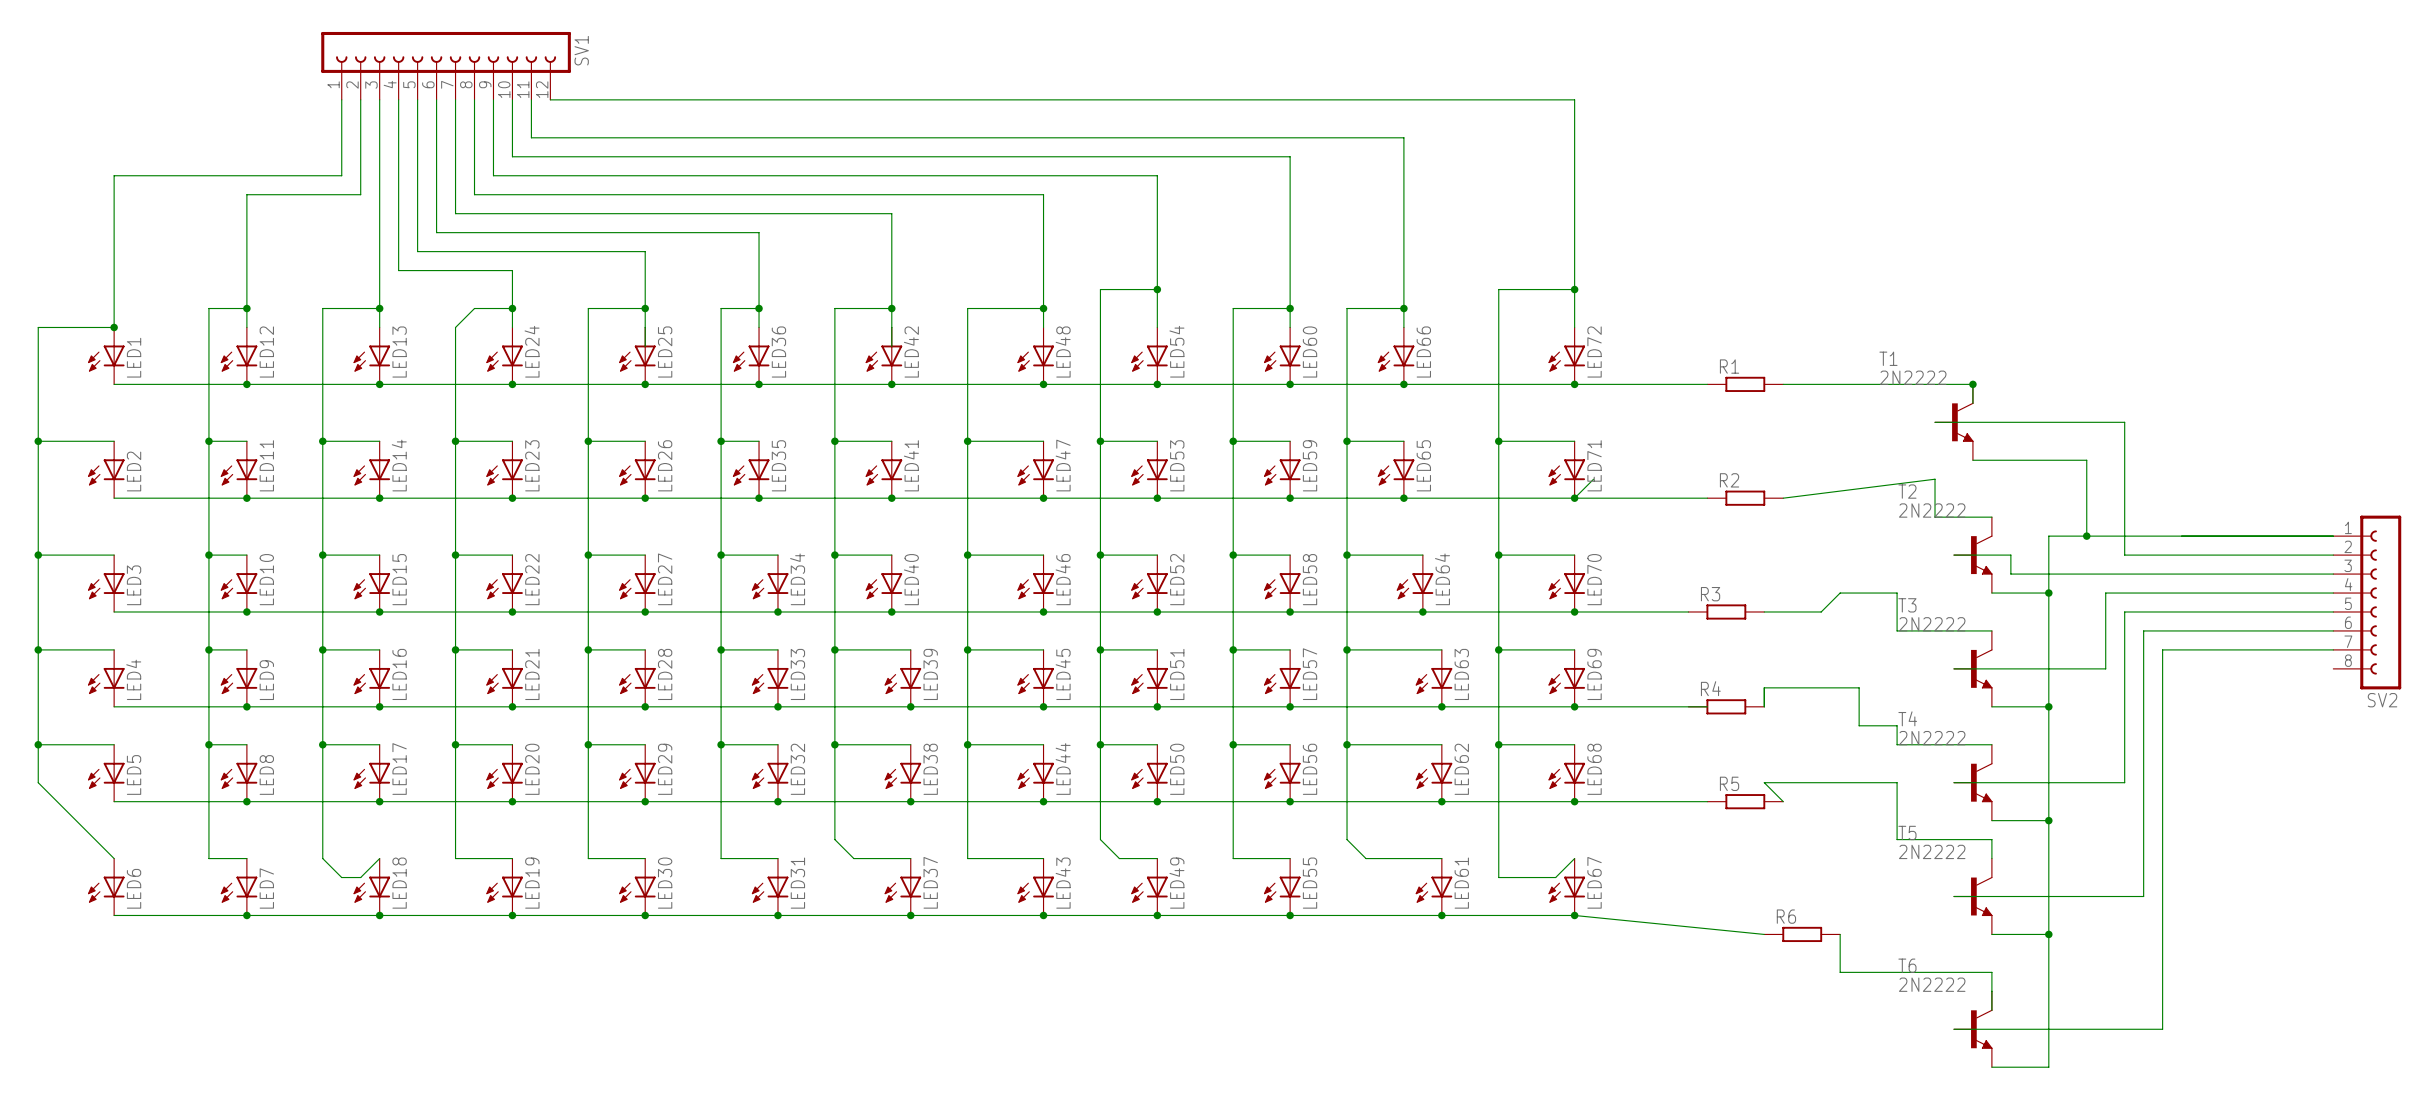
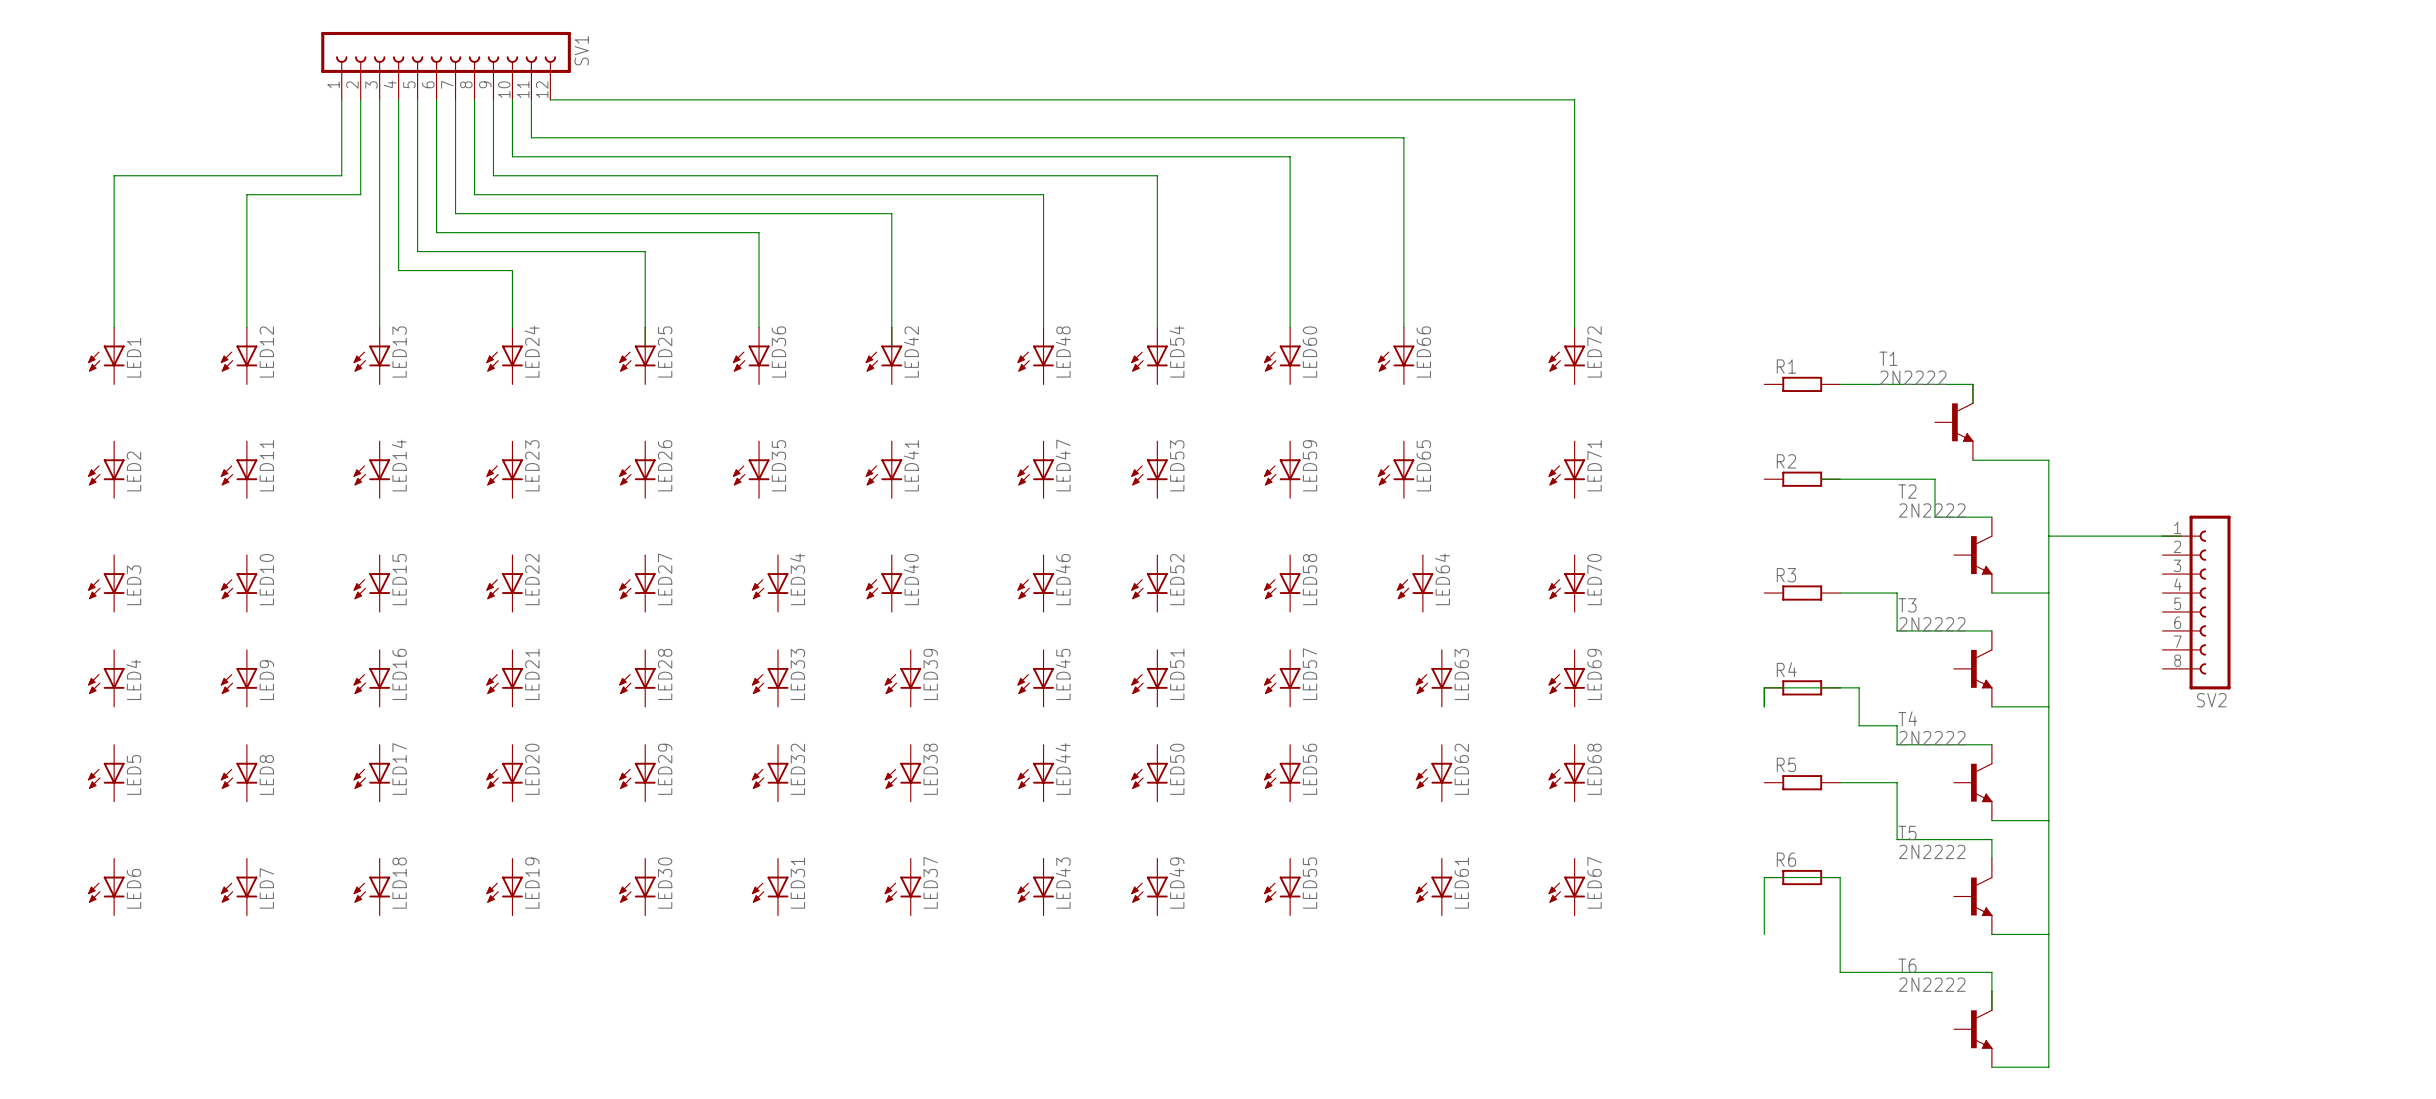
wire: (1157, 289) (1100, 289) (1100, 839) (1119, 858) (1157, 858) -> none
junction: (1157, 289) -> none
wire: (1574, 289) (1498, 289) (1498, 877) (1555, 877) (1574, 858) -> none
junction: (1574, 289) -> none
wire: (246, 308) (208, 308) (208, 858) (246, 858) -> none
junction: (246, 308) -> none
wire: (379, 308) (322, 308) (322, 858) (341, 877) (360, 877) (379, 858) -> none
junction: (379, 308) -> none
wire: (512, 308) (474, 308) (455, 327) (455, 858) (512, 858) -> none
junction: (512, 308) -> none
wire: (645, 308) (588, 308) (588, 858) (645, 858) -> none
junction: (645, 308) -> none
wire: (759, 308) (721, 308) (721, 858) (777, 858) -> none
junction: (759, 308) -> none
wire: (891, 308) (834, 308) (834, 839) (853, 858) (910, 858) -> none
junction: (891, 308) -> none
wire: (1043, 308) (967, 308) (967, 858) (1043, 858) -> none
junction: (1043, 308) -> none
wire: (1290, 308) (1233, 308) (1233, 858) (1290, 858) -> none
junction: (1290, 308) -> none
wire: (1403, 308) (1347, 308) (1347, 839) (1365, 858) (1441, 858) -> none
junction: (1403, 308) -> none
wire: (114, 327) (38, 327) (38, 782) (114, 858) -> none
junction: (114, 327) -> none
wire: (114, 384) (1707, 384) -> none
junction: (246, 384) -> none
junction: (379, 384) -> none
junction: (512, 384) -> none
junction: (645, 384) -> none
junction: (759, 384) -> none
junction: (891, 384) -> none
junction: (1043, 384) -> none
junction: (1157, 384) -> none
junction: (1290, 384) -> none
junction: (1403, 384) -> none
junction: (1574, 384) -> none
R1 position: (1745, 384) -> (1802, 384)
wire: (1783, 384) (1840, 384) -> none
junction: (1972, 384) -> none
wire: (1935, 422) (2124, 422) (2124, 555) (2333, 555) -> none
wire: (38, 441) (114, 441) -> none
junction: (38, 441) -> none
wire: (208, 441) (246, 441) -> none
junction: (208, 441) -> none
wire: (322, 441) (379, 441) -> none
junction: (322, 441) -> none
wire: (455, 441) (512, 441) -> none
junction: (455, 441) -> none
wire: (588, 441) (645, 441) -> none
junction: (588, 441) -> none
wire: (721, 441) (759, 441) -> none
junction: (721, 441) -> none
wire: (834, 441) (891, 441) -> none
junction: (834, 441) -> none
wire: (967, 441) (1043, 441) -> none
junction: (967, 441) -> none
wire: (1100, 441) (1157, 441) -> none
junction: (1100, 441) -> none
wire: (1233, 441) (1290, 441) -> none
junction: (1233, 441) -> none
wire: (1347, 441) (1403, 441) -> none
junction: (1347, 441) -> none
wire: (1498, 441) (1574, 441) -> none
junction: (1498, 441) -> none
wire: (2048, 460) (2086, 460) (2086, 536) -> (2048, 460) (2048, 536)
wire: (1593, 479) (1574, 498) -> none
wire: (1935, 479) (1783, 498) -> (1935, 479) (1821, 479)
wire: (114, 498) (1707, 498) -> none
junction: (246, 498) -> none
junction: (379, 498) -> none
junction: (512, 498) -> none
junction: (645, 498) -> none
junction: (759, 498) -> none
junction: (891, 498) -> none
junction: (1043, 498) -> none
junction: (1157, 498) -> none
junction: (1290, 498) -> none
junction: (1403, 498) -> none
junction: (1574, 498) -> none
R2 position: (1745, 498) -> (1802, 479)
junction: (2086, 536) -> none
wire: (2181, 536) (2333, 536) -> none
wire: (38, 555) (114, 555) -> none
junction: (38, 555) -> none
wire: (208, 555) (246, 555) -> none
junction: (208, 555) -> none
wire: (322, 555) (379, 555) -> none
junction: (322, 555) -> none
wire: (455, 555) (512, 555) -> none
junction: (455, 555) -> none
wire: (588, 555) (645, 555) -> none
junction: (588, 555) -> none
wire: (721, 555) (777, 555) -> none
junction: (721, 555) -> none
wire: (834, 555) (891, 555) -> none
junction: (834, 555) -> none
wire: (967, 555) (1043, 555) -> none
junction: (967, 555) -> none
wire: (1100, 555) (1157, 555) -> none
junction: (1100, 555) -> none
wire: (1233, 555) (1290, 555) -> none
junction: (1233, 555) -> none
wire: (1347, 555) (1422, 555) -> none
junction: (1347, 555) -> none
wire: (1498, 555) (1574, 555) -> none
junction: (1498, 555) -> none
wire: (1953, 555) (2010, 555) (2010, 574) (2333, 574) -> none
wire: (1840, 593) (1821, 611) (1764, 611) -> none
junction: (2048, 593) -> none
wire: (2333, 593) (2105, 593) (2105, 668) (1953, 668) -> none
SV2 position: (2367, 602) -> (2196, 602)
wire: (114, 611) (1688, 611) -> none
junction: (246, 611) -> none
junction: (379, 611) -> none
junction: (512, 611) -> none
junction: (645, 611) -> none
junction: (777, 611) -> none
junction: (891, 611) -> none
junction: (1043, 611) -> none
junction: (1157, 611) -> none
junction: (1290, 611) -> none
junction: (1422, 611) -> none
junction: (1574, 611) -> none
R3 position: (1726, 611) -> (1802, 593)
wire: (2333, 611) (2124, 611) (2124, 782) (1953, 782) -> none
wire: (2333, 630) (2143, 630) (2143, 896) (1953, 896) -> none
wire: (38, 649) (114, 649) -> none
junction: (38, 649) -> none
wire: (208, 649) (246, 649) -> none
junction: (208, 649) -> none
wire: (322, 649) (379, 649) -> none
junction: (322, 649) -> none
wire: (455, 649) (512, 649) -> none
junction: (455, 649) -> none
wire: (588, 649) (645, 649) -> none
junction: (588, 649) -> none
wire: (721, 649) (777, 649) -> none
junction: (721, 649) -> none
wire: (834, 649) (910, 649) -> none
junction: (834, 649) -> none
wire: (967, 649) (1043, 649) -> none
junction: (967, 649) -> none
wire: (1100, 649) (1157, 649) -> none
junction: (1100, 649) -> none
wire: (1233, 649) (1290, 649) -> none
junction: (1233, 649) -> none
wire: (1347, 649) (1441, 649) -> none
junction: (1347, 649) -> none
wire: (1498, 649) (1574, 649) -> none
junction: (1498, 649) -> none
wire: (2333, 649) (2162, 649) (2162, 1029) (1953, 1029) -> none
wire: (114, 706) (1707, 706) -> none
junction: (246, 706) -> none
junction: (379, 706) -> none
junction: (512, 706) -> none
junction: (645, 706) -> none
junction: (777, 706) -> none
junction: (910, 706) -> none
junction: (1043, 706) -> none
junction: (1157, 706) -> none
junction: (1290, 706) -> none
junction: (1441, 706) -> none
junction: (1574, 706) -> none
R4 position: (1726, 706) -> (1802, 687)
junction: (2048, 706) -> none
wire: (38, 744) (114, 744) -> none
junction: (38, 744) -> none
wire: (208, 744) (246, 744) -> none
junction: (208, 744) -> none
wire: (322, 744) (379, 744) -> none
junction: (322, 744) -> none
wire: (455, 744) (512, 744) -> none
junction: (455, 744) -> none
wire: (588, 744) (645, 744) -> none
junction: (588, 744) -> none
wire: (721, 744) (777, 744) -> none
junction: (721, 744) -> none
wire: (834, 744) (910, 744) -> none
junction: (834, 744) -> none
wire: (967, 744) (1043, 744) -> none
junction: (967, 744) -> none
wire: (1100, 744) (1157, 744) -> none
junction: (1100, 744) -> none
wire: (1233, 744) (1290, 744) -> none
junction: (1233, 744) -> none
wire: (1347, 744) (1441, 744) -> none
junction: (1347, 744) -> none
wire: (1498, 744) (1574, 744) -> none
junction: (1498, 744) -> none
wire: (1840, 782) (1764, 782) (1783, 801) -> none
wire: (114, 801) (1707, 801) -> none
junction: (246, 801) -> none
junction: (379, 801) -> none
junction: (512, 801) -> none
junction: (645, 801) -> none
junction: (777, 801) -> none
junction: (910, 801) -> none
junction: (1043, 801) -> none
junction: (1157, 801) -> none
junction: (1290, 801) -> none
junction: (1441, 801) -> none
junction: (1574, 801) -> none
R5 position: (1745, 801) -> (1802, 782)
junction: (2048, 820) -> none
wire: (114, 915) (1574, 915) (1764, 934) -> (1840, 934) (1840, 877) (1764, 877) (1764, 934)
junction: (246, 915) -> none
junction: (379, 915) -> none
junction: (512, 915) -> none
junction: (645, 915) -> none
junction: (777, 915) -> none
junction: (910, 915) -> none
junction: (1043, 915) -> none
junction: (1157, 915) -> none
junction: (1290, 915) -> none
junction: (1441, 915) -> none
junction: (1574, 915) -> none
R6 position: (1802, 934) -> (1802, 877)
junction: (2048, 934) -> none

